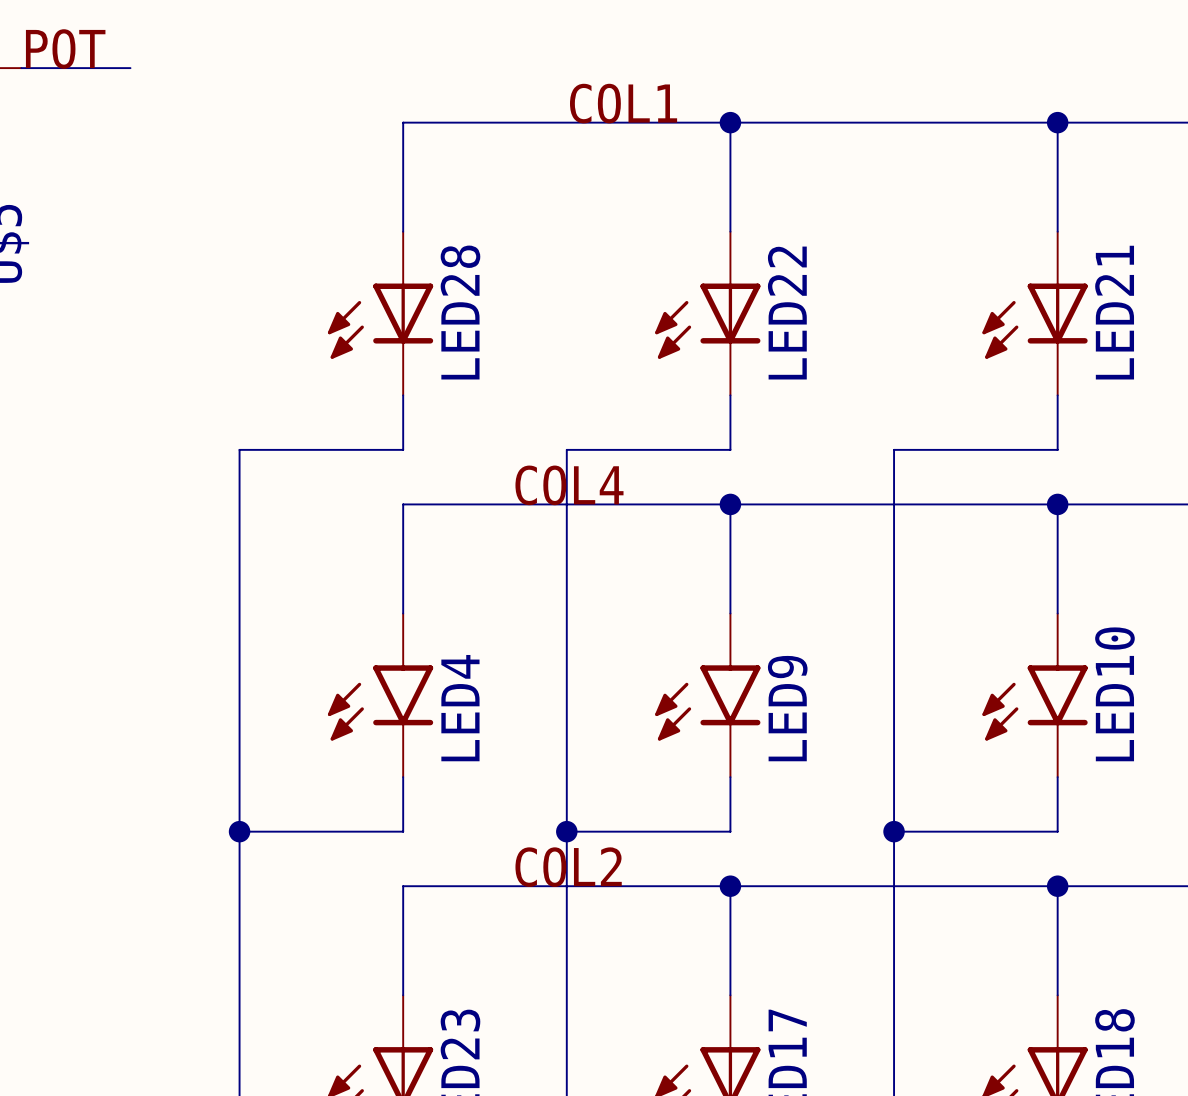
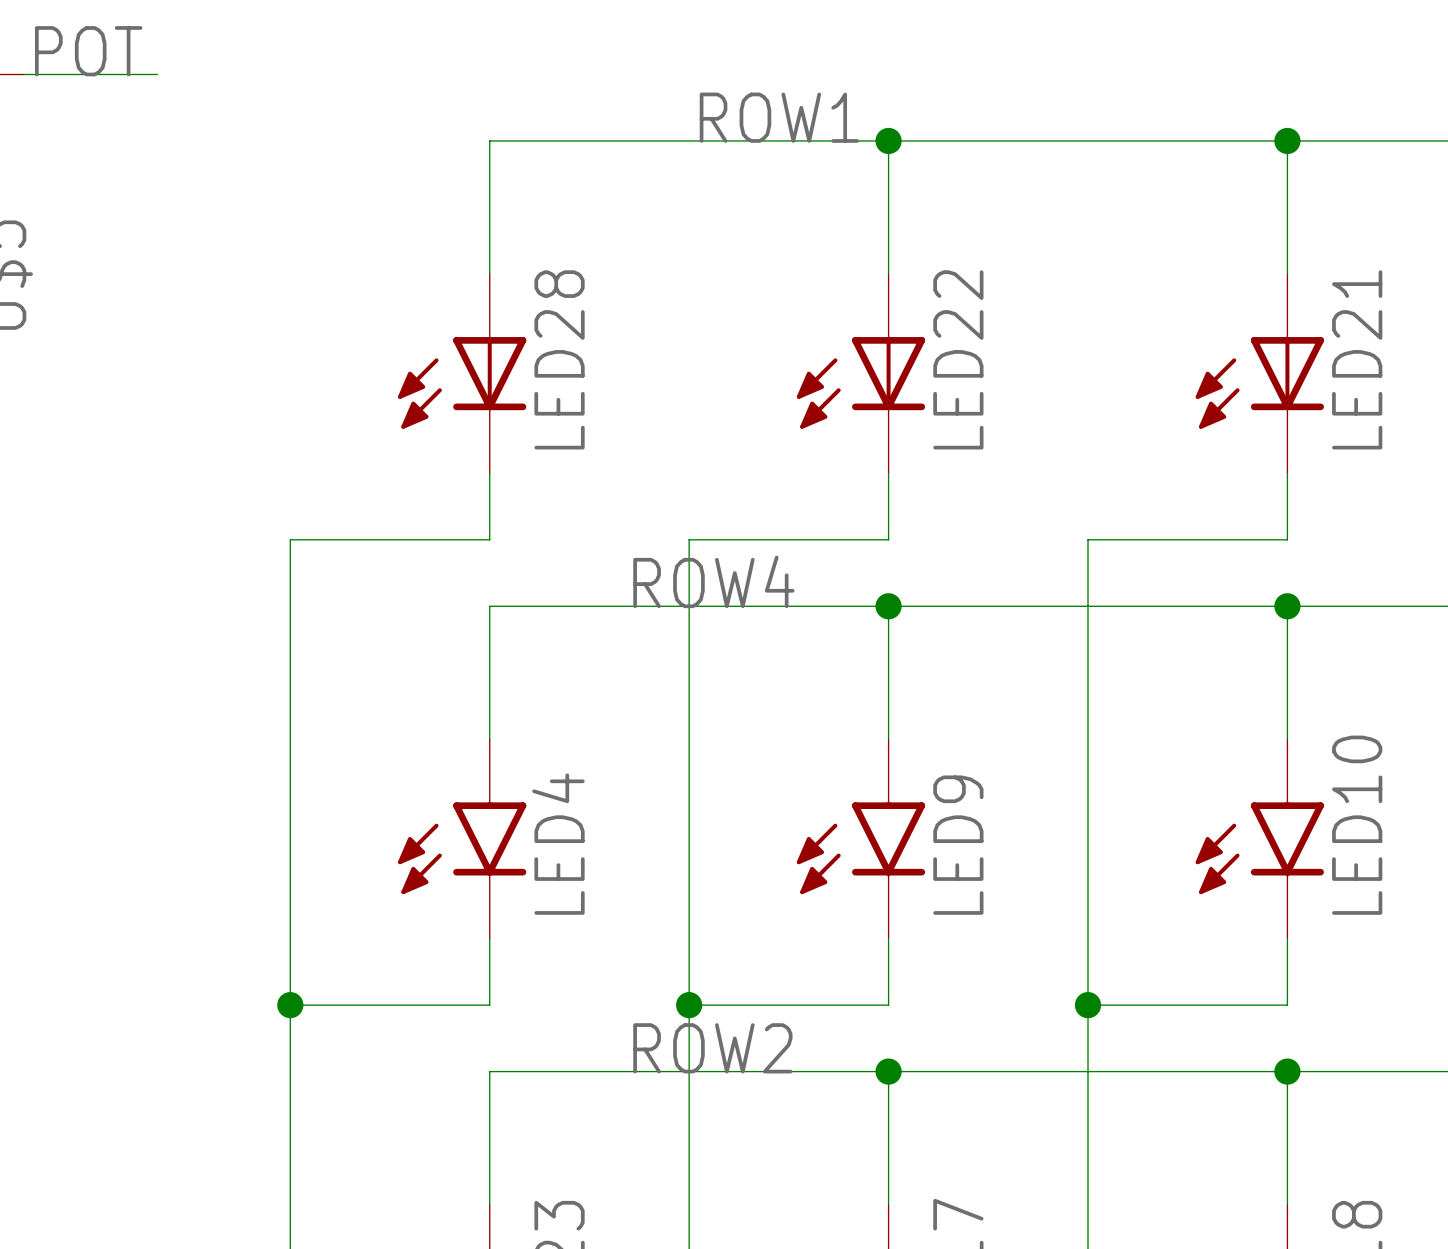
label: COL1 (623, 103) -> ROW1 (779, 117)
label: COL4 (569, 485) -> ROW4 (713, 581)
label: COL2 (568, 867) -> ROW2 (712, 1048)

